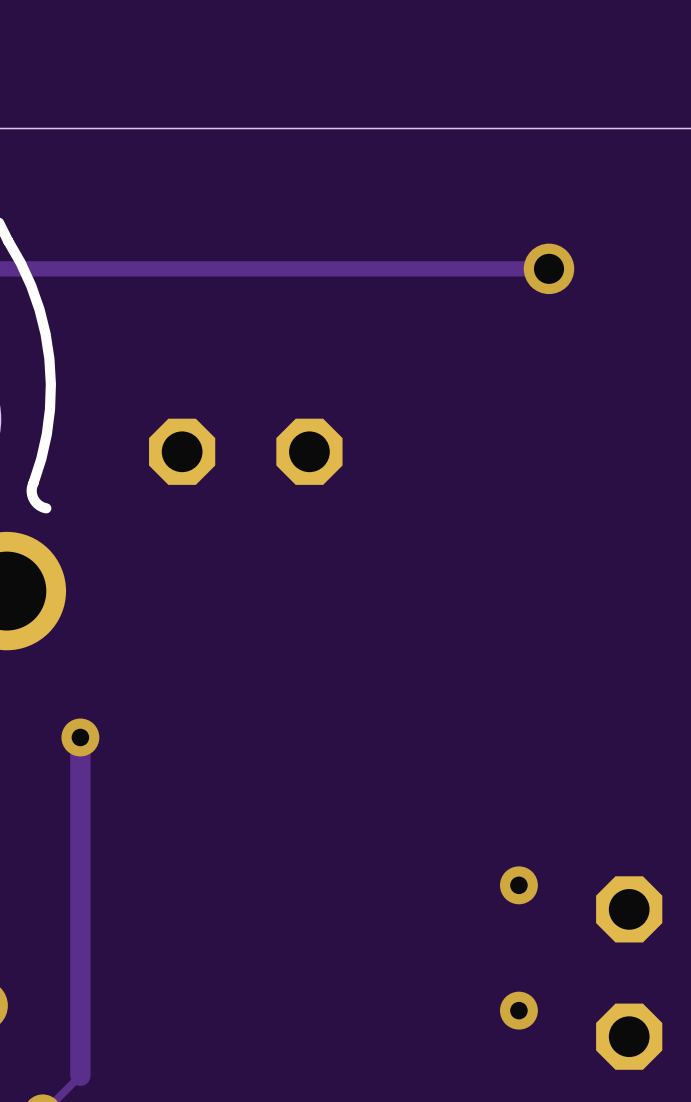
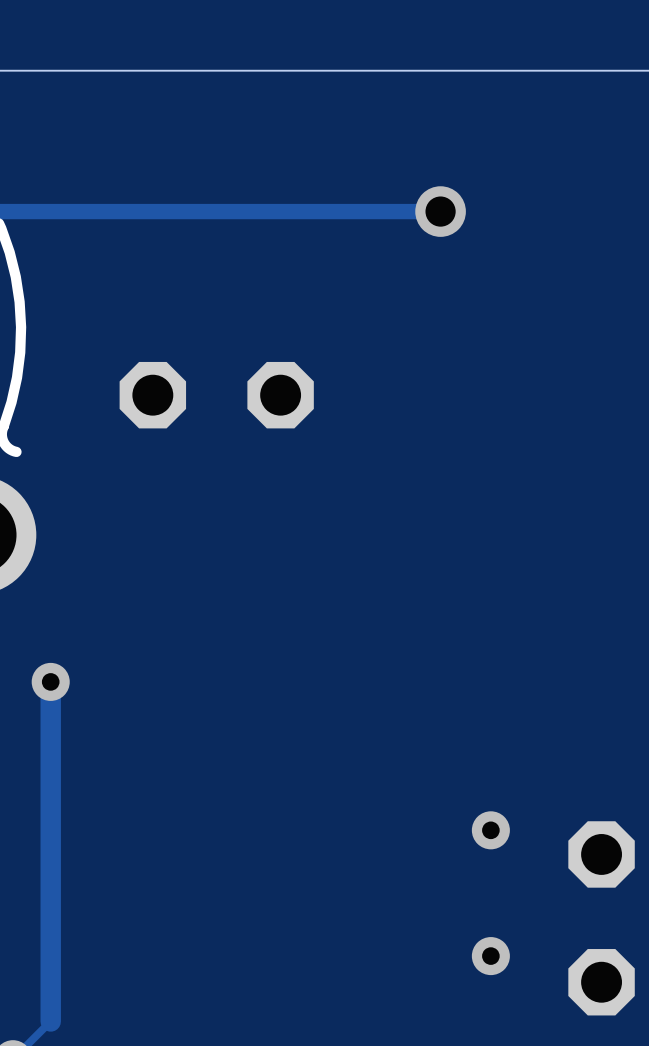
track: (549, 268) (468, 268) -> none
via position: (549, 268) -> (440, 211)

